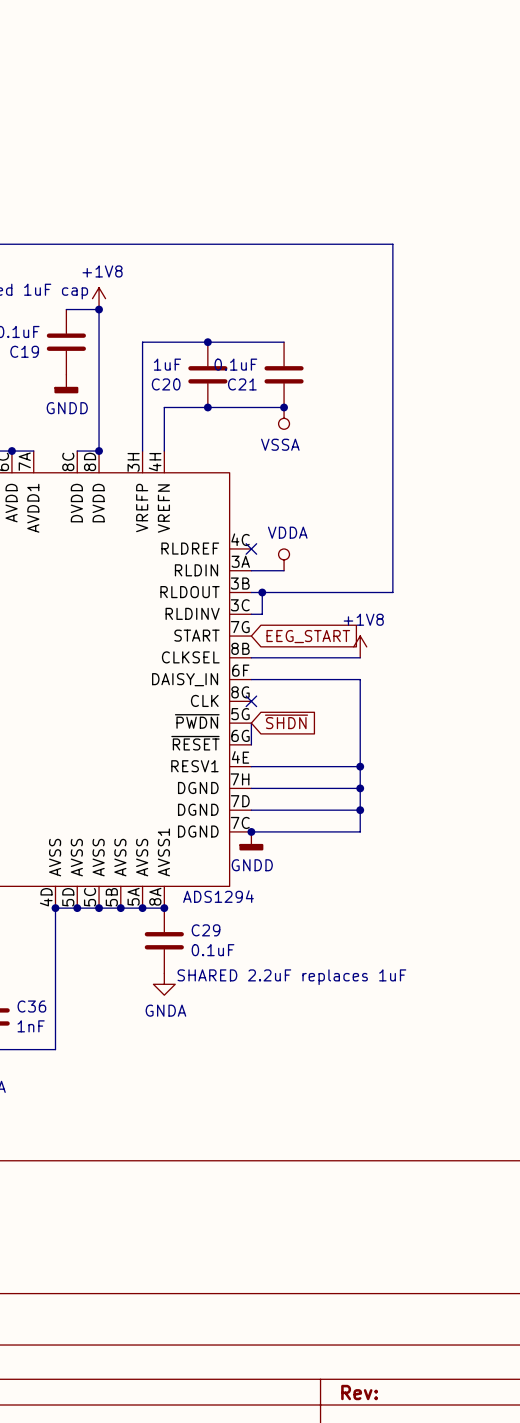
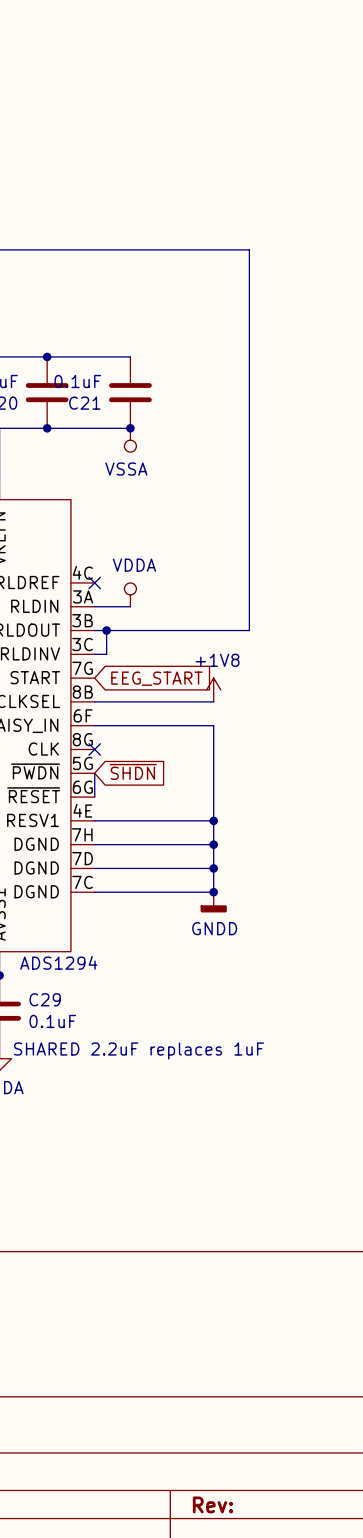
junction: (251, 831) -> none
junction: none -> (213, 892)
power symbol position: GNDD (251, 841) -> GNDD (213, 902)

